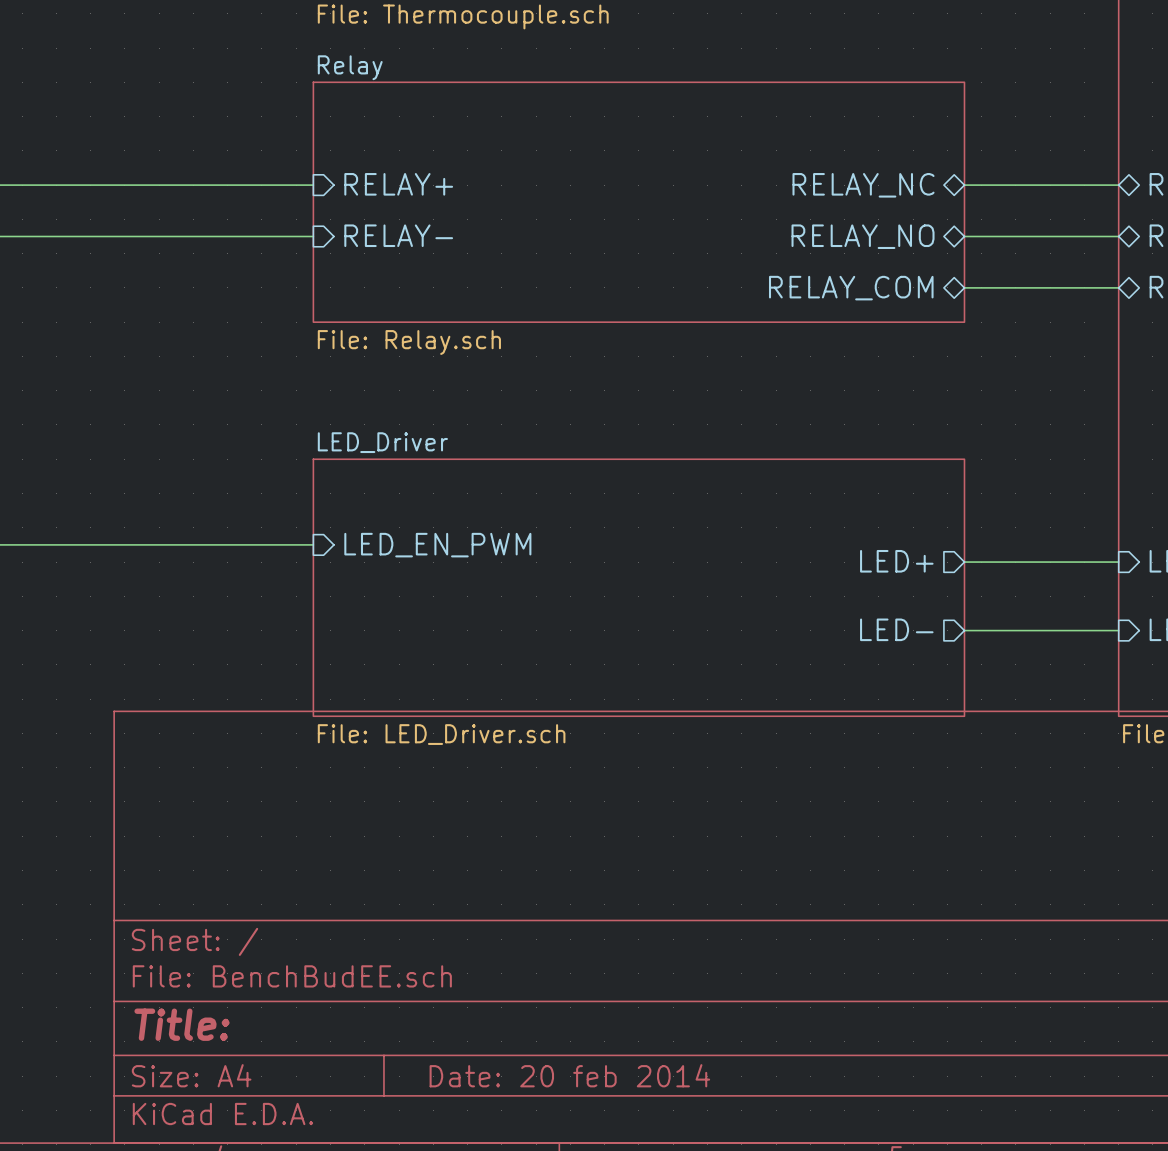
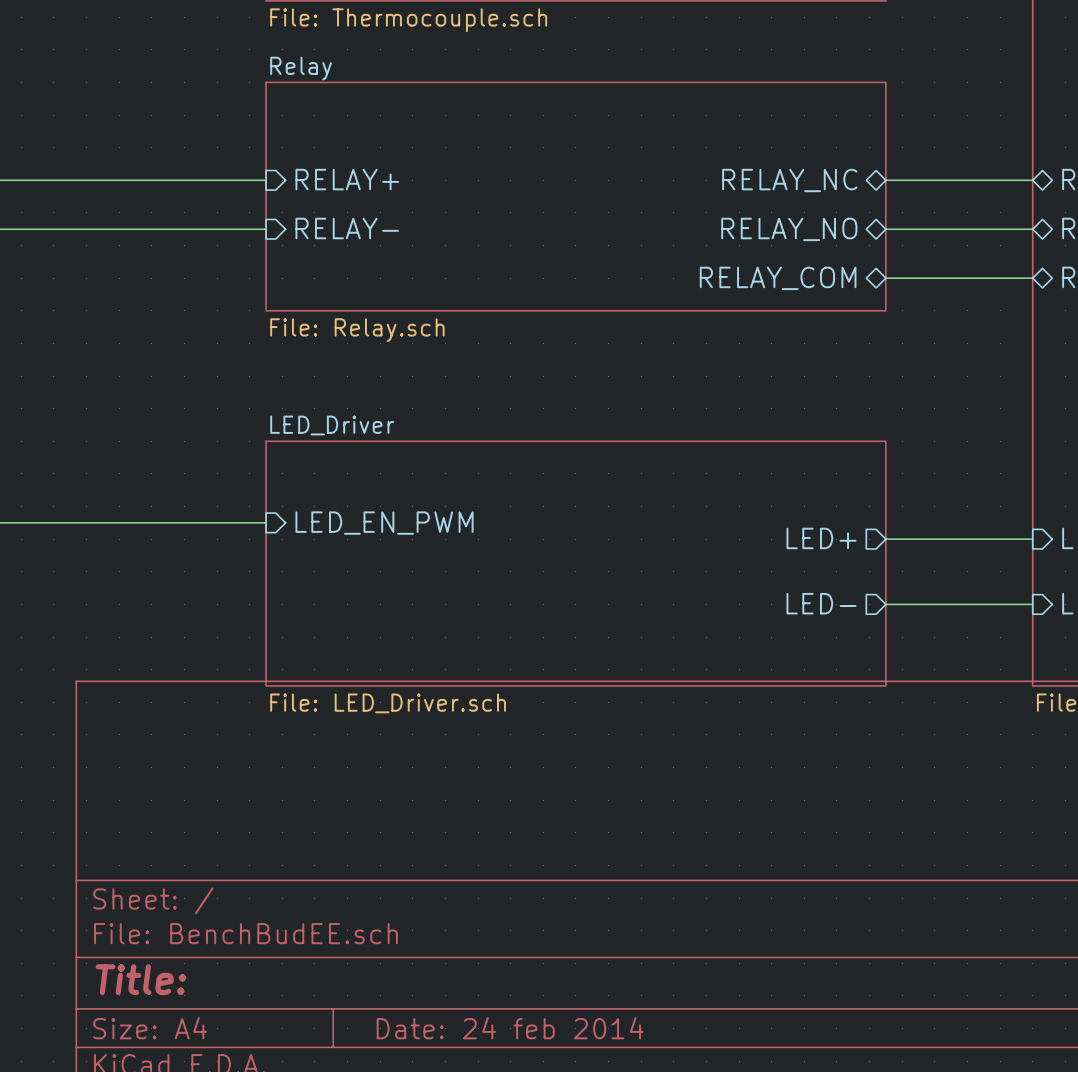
title block: Date: 20 feb 2014 (569, 1075) -> Date: 24 feb 2014 (510, 1028)

